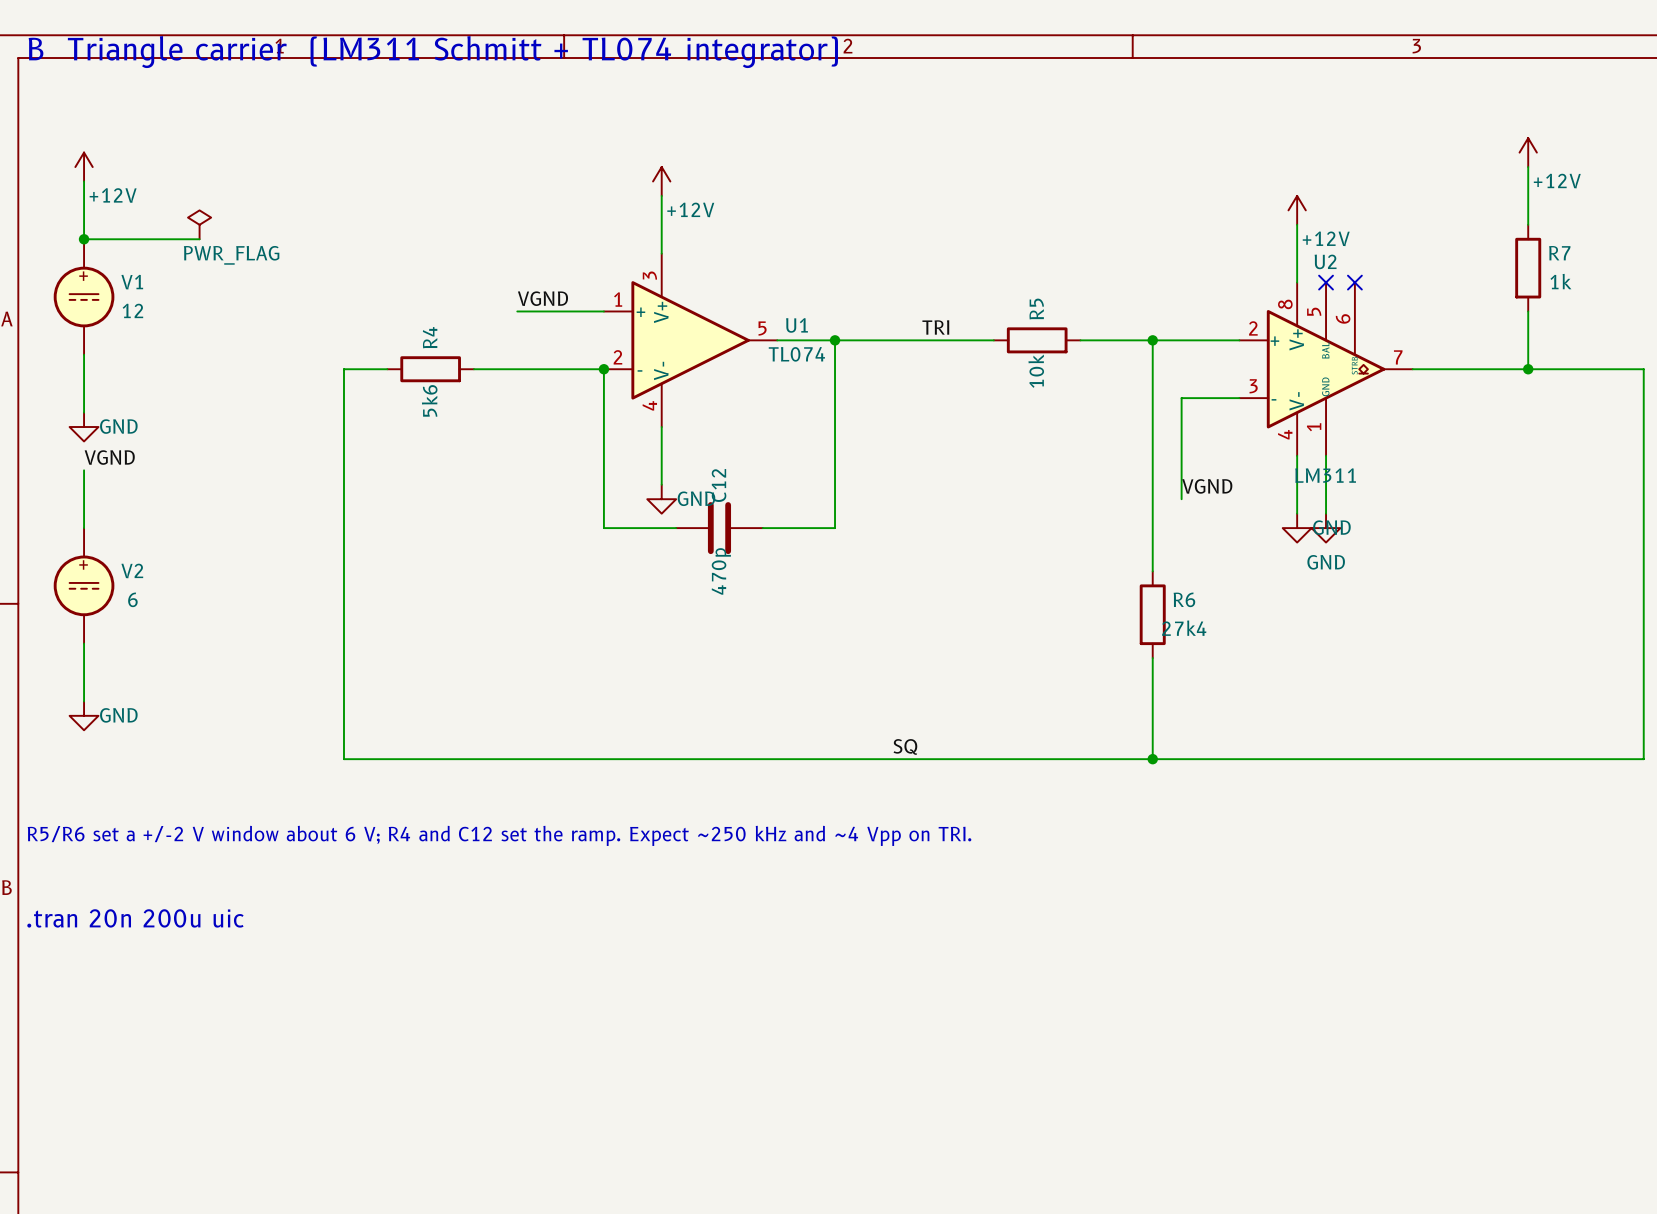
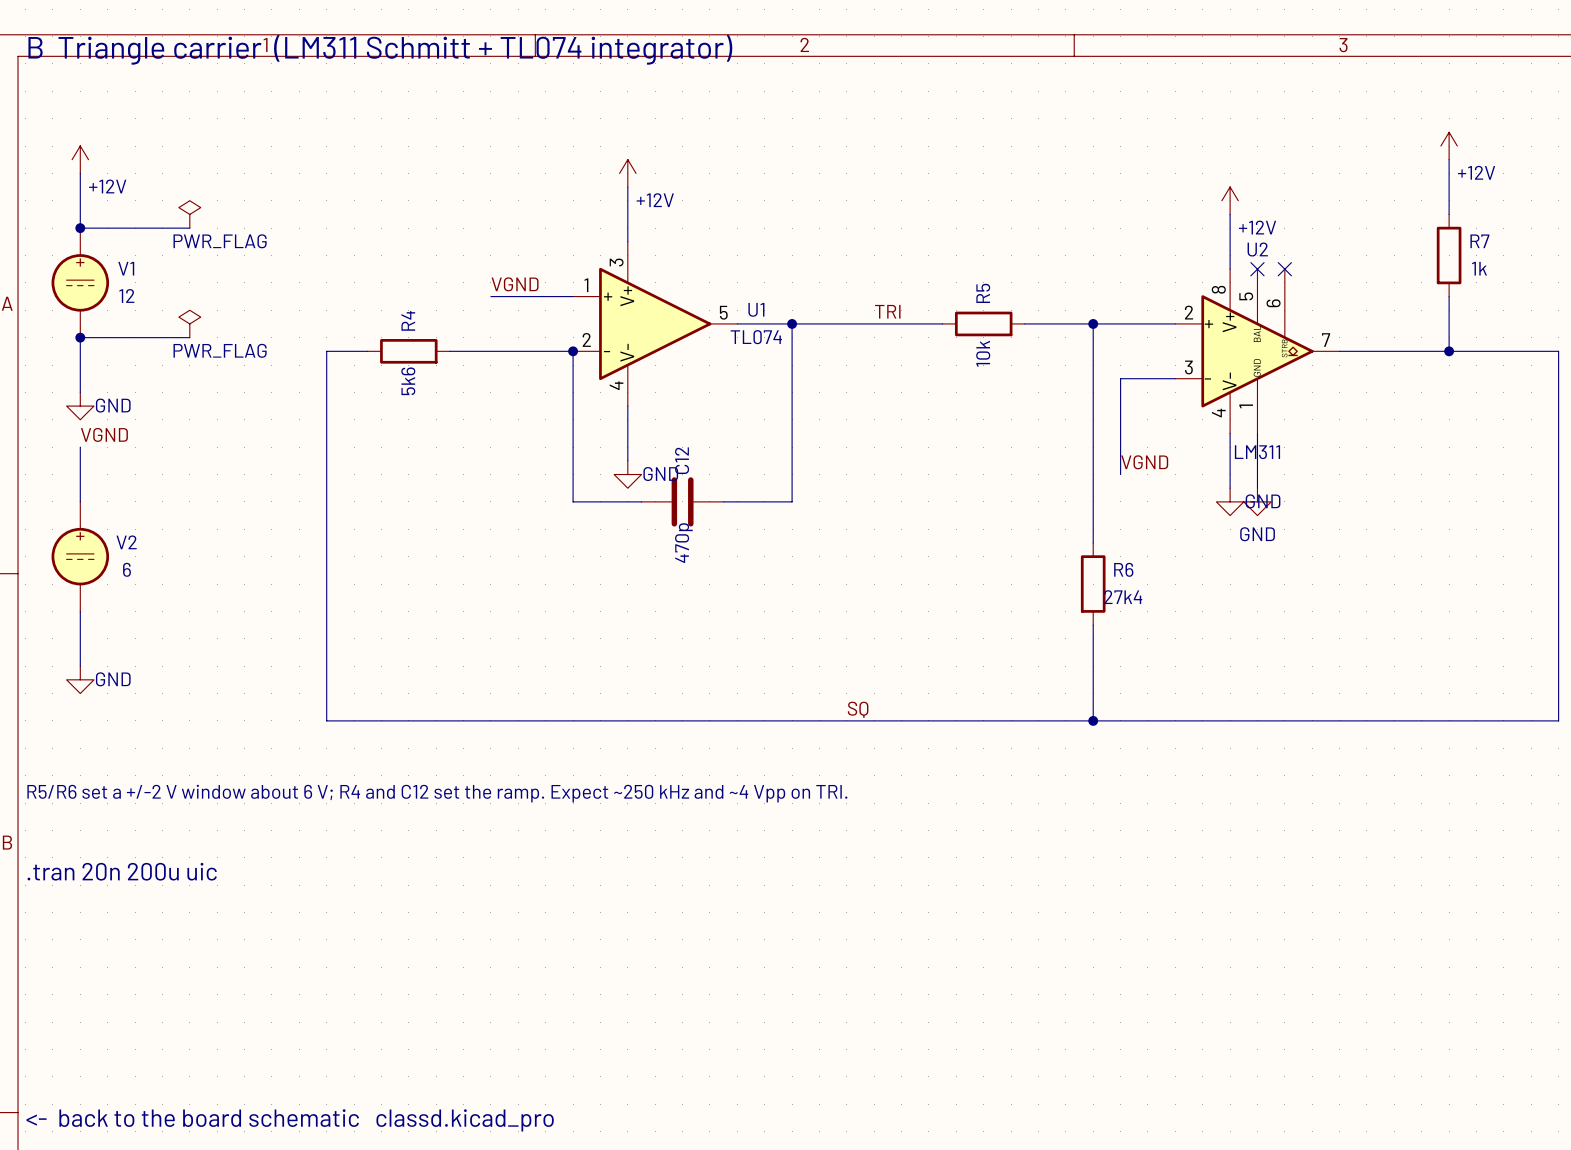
power symbol: none -> PWR_FLAG (189, 323)
wire: none -> (80, 337) (189, 337)
junction: none -> (80, 337)
text: none -> <- back to the board schematic classd.kicad_pro (290, 1120)

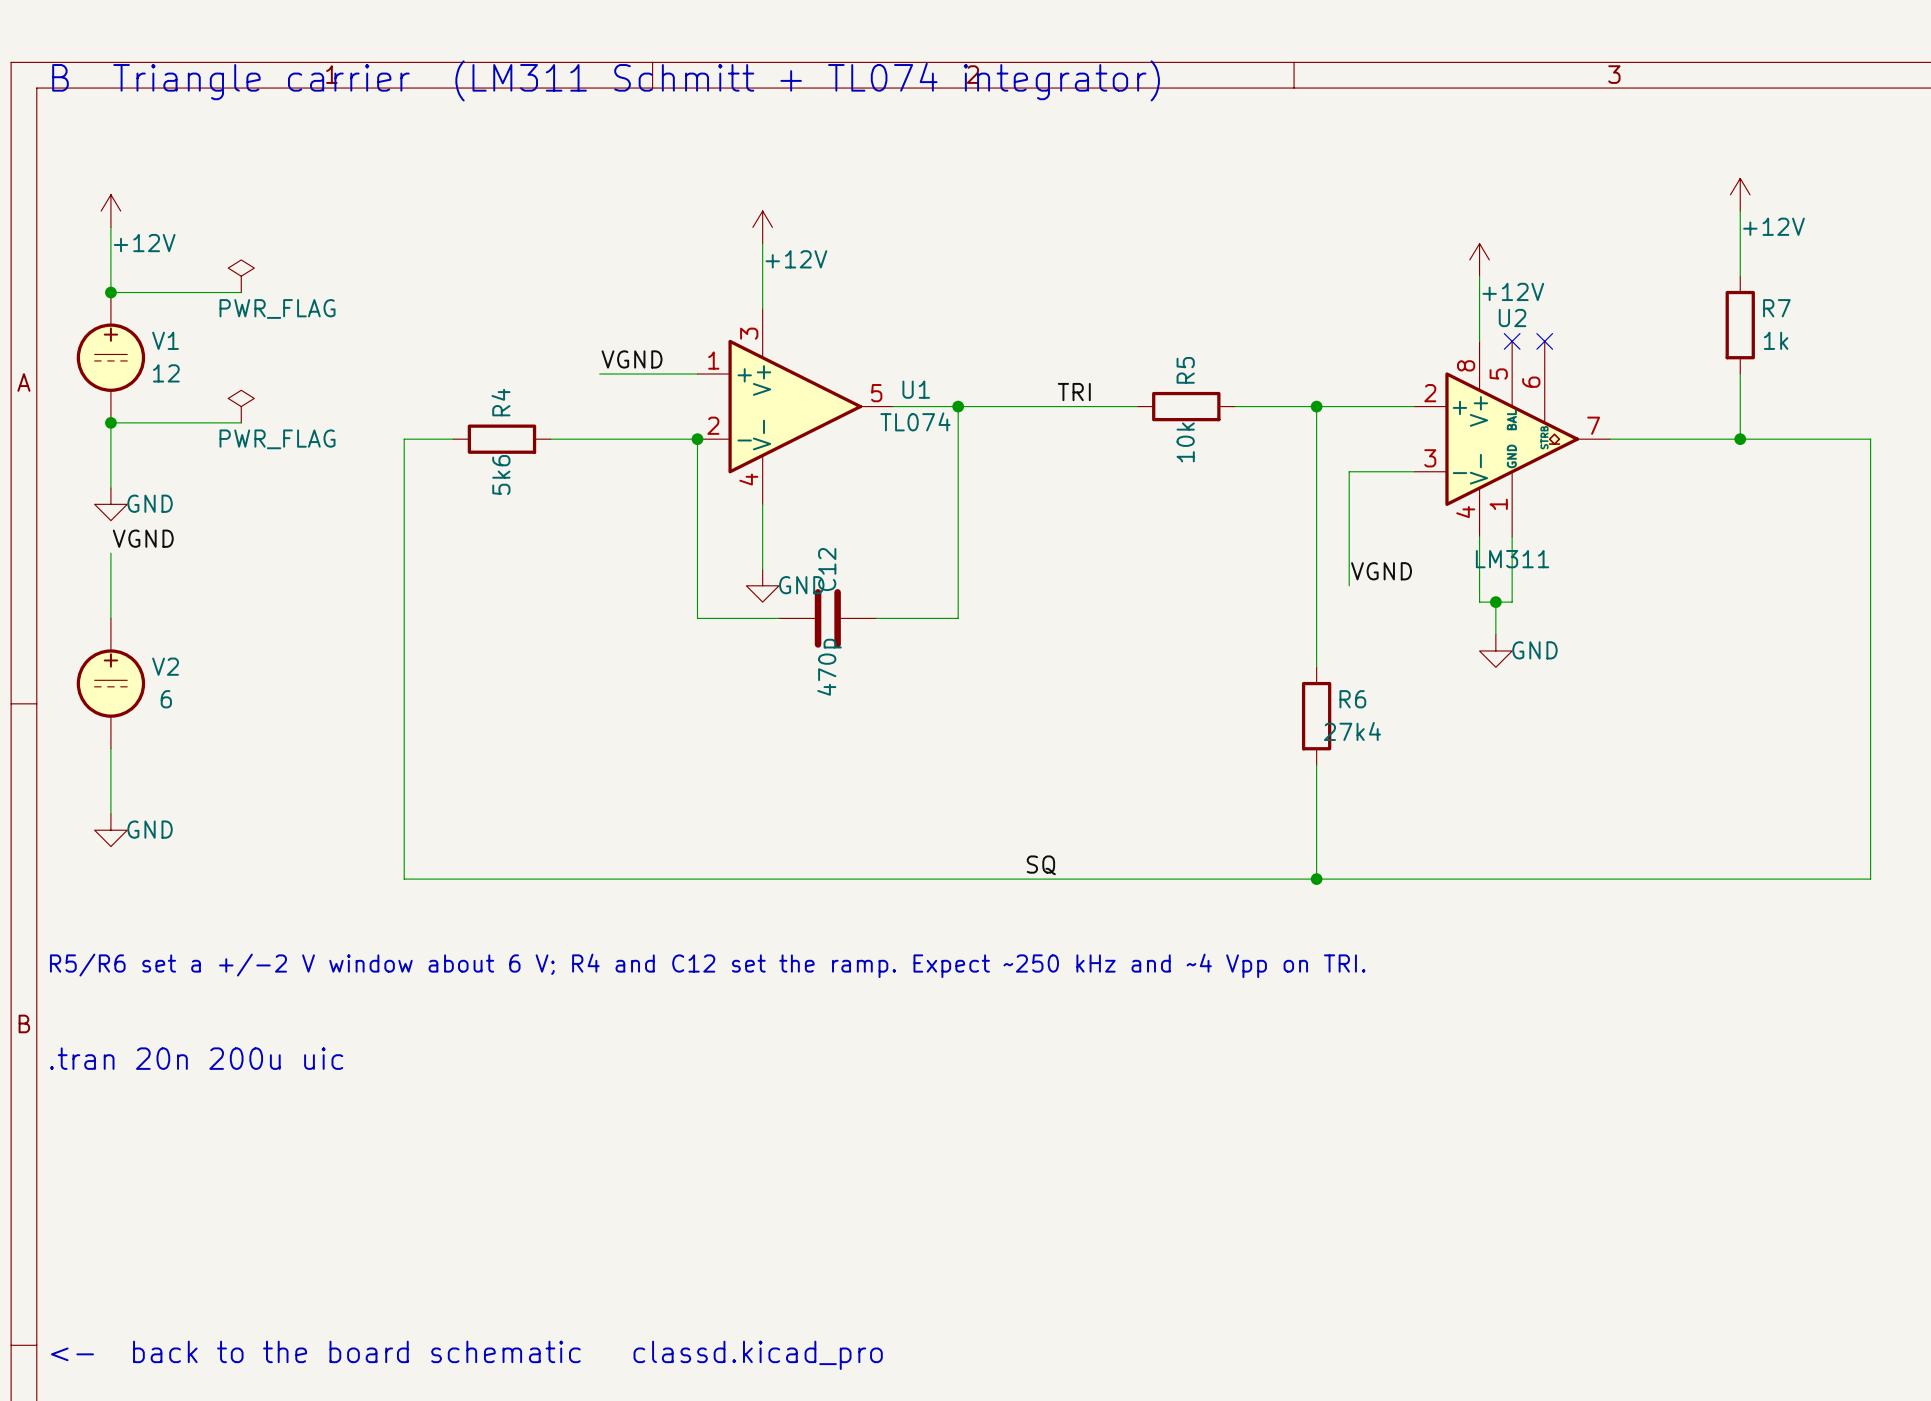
wire: none -> (1479, 602) (1512, 602)
wire: none -> (1495, 602) (1495, 634)
junction: none -> (1495, 602)
power symbol: GND (1230, 501) -> none
power symbol: GND (1257, 501) -> none
power symbol: none -> GND (1495, 650)

